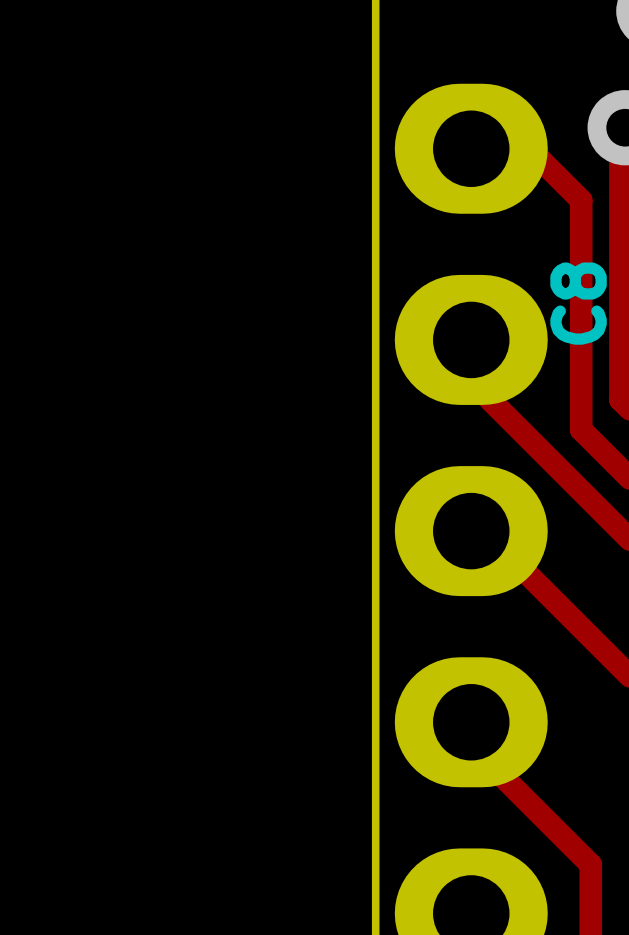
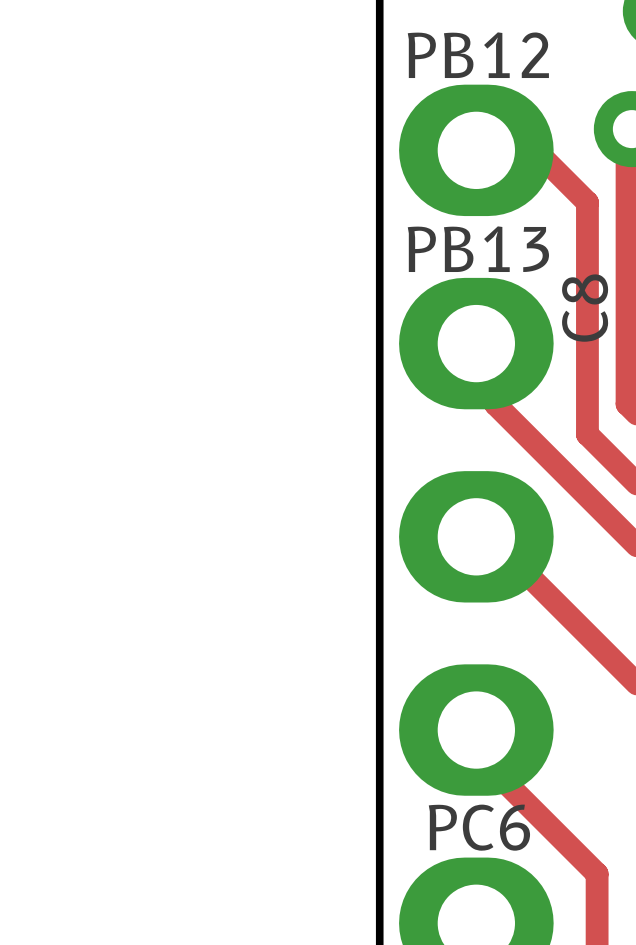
text: none -> PB12 (478, 55)
text: none -> PB13 (478, 249)
text: none -> PC6 (479, 827)

